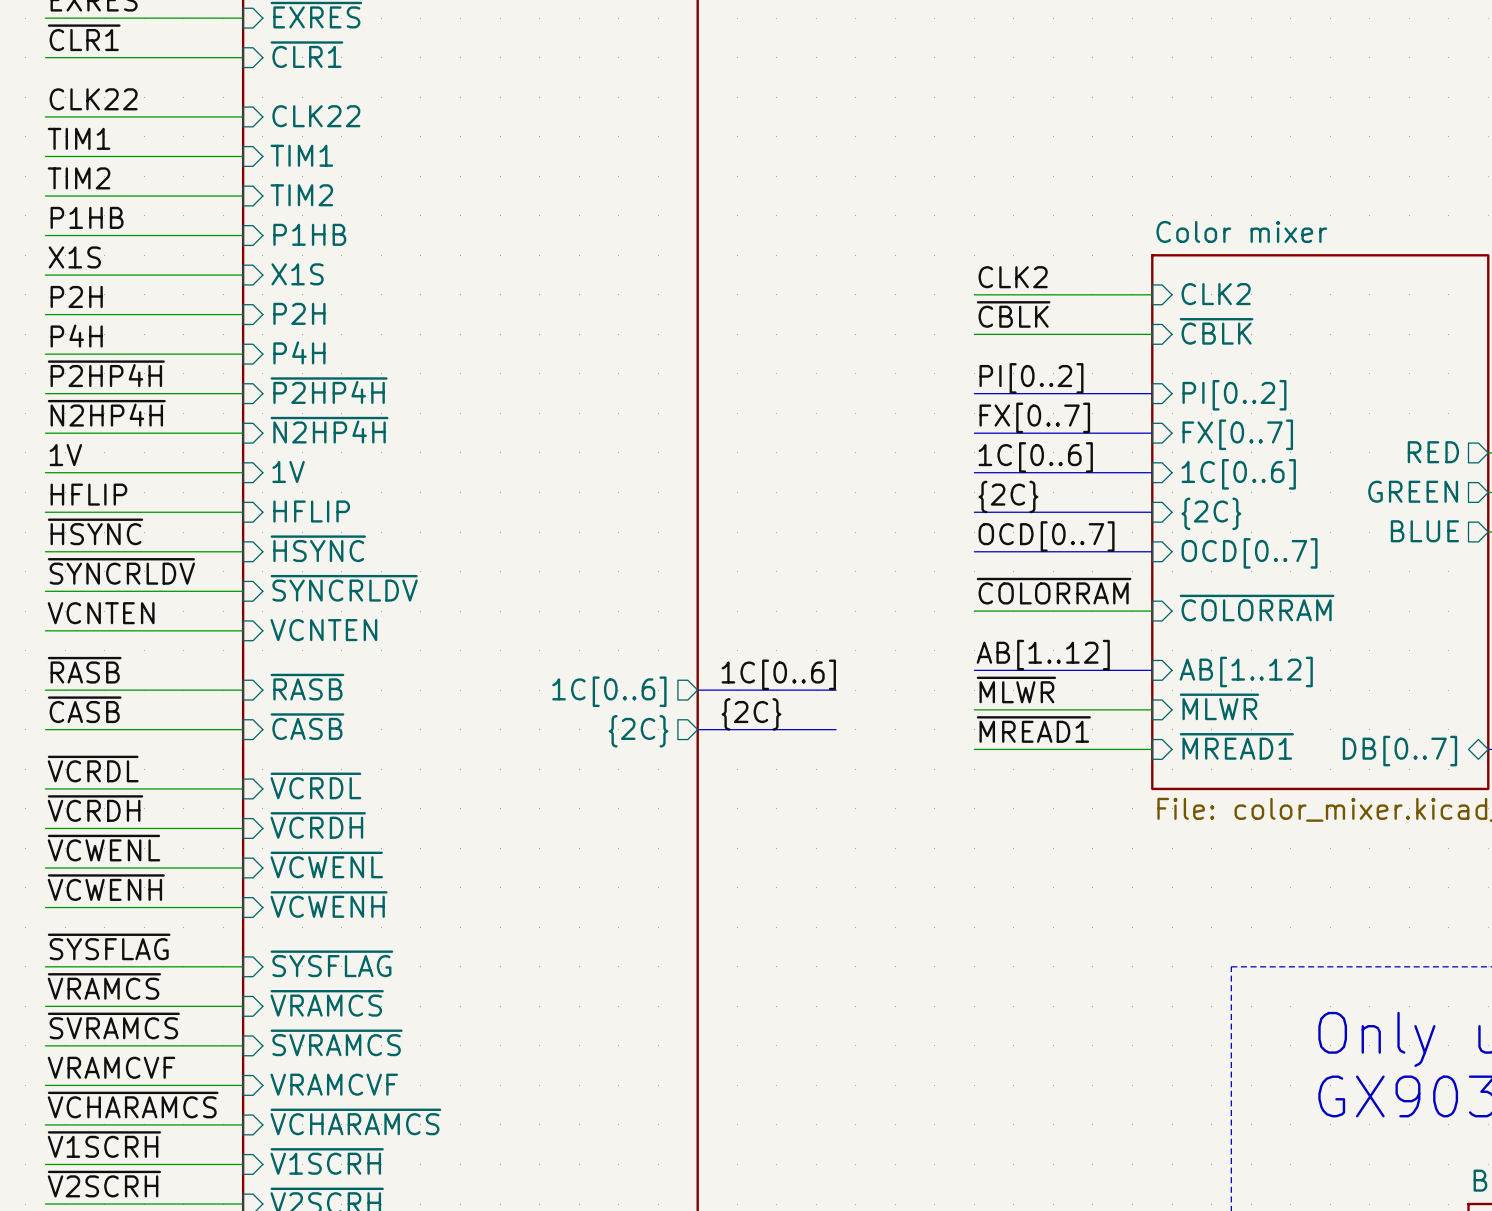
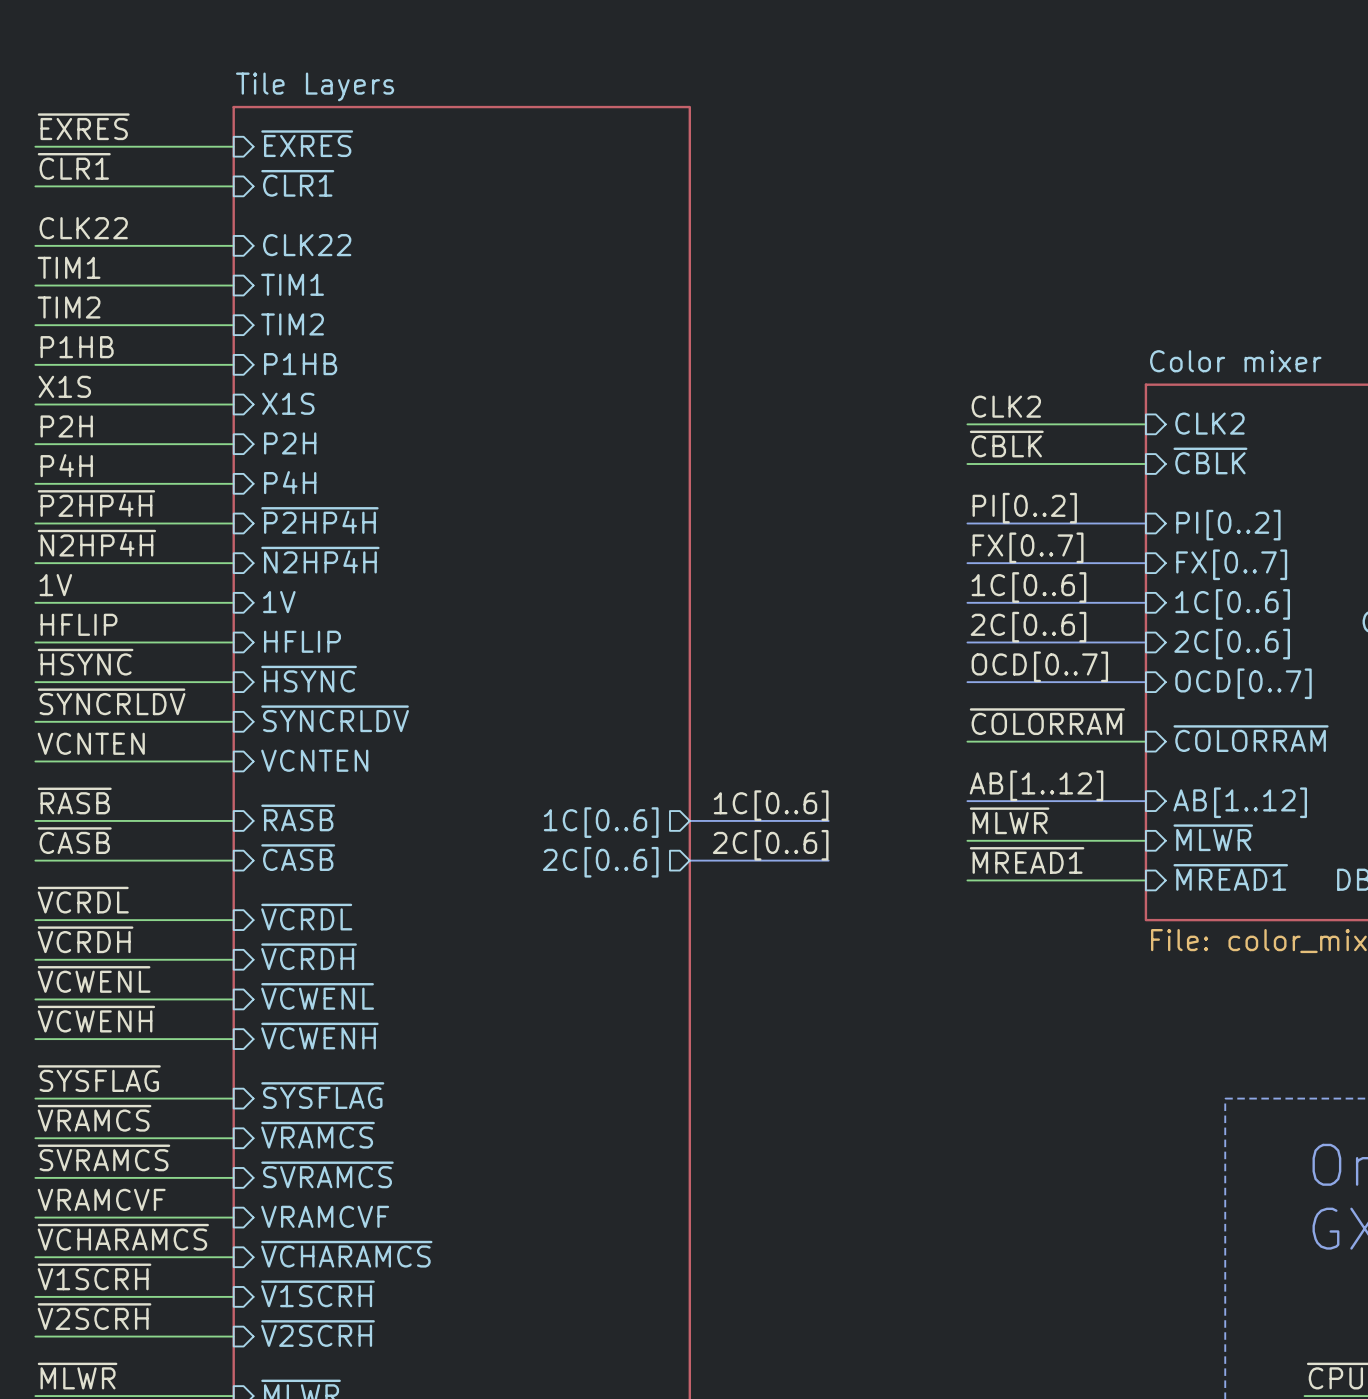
label: {2C} (1008, 496) -> 2C[0..6] (1028, 627)
sheet pin: {2C} (1211, 513) -> 2C[0..6] (1232, 644)
label: {2C} (751, 714) -> 2C[0..6] (770, 845)
sheet pin: {2C} (638, 731) -> 2C[0..6] (600, 862)

